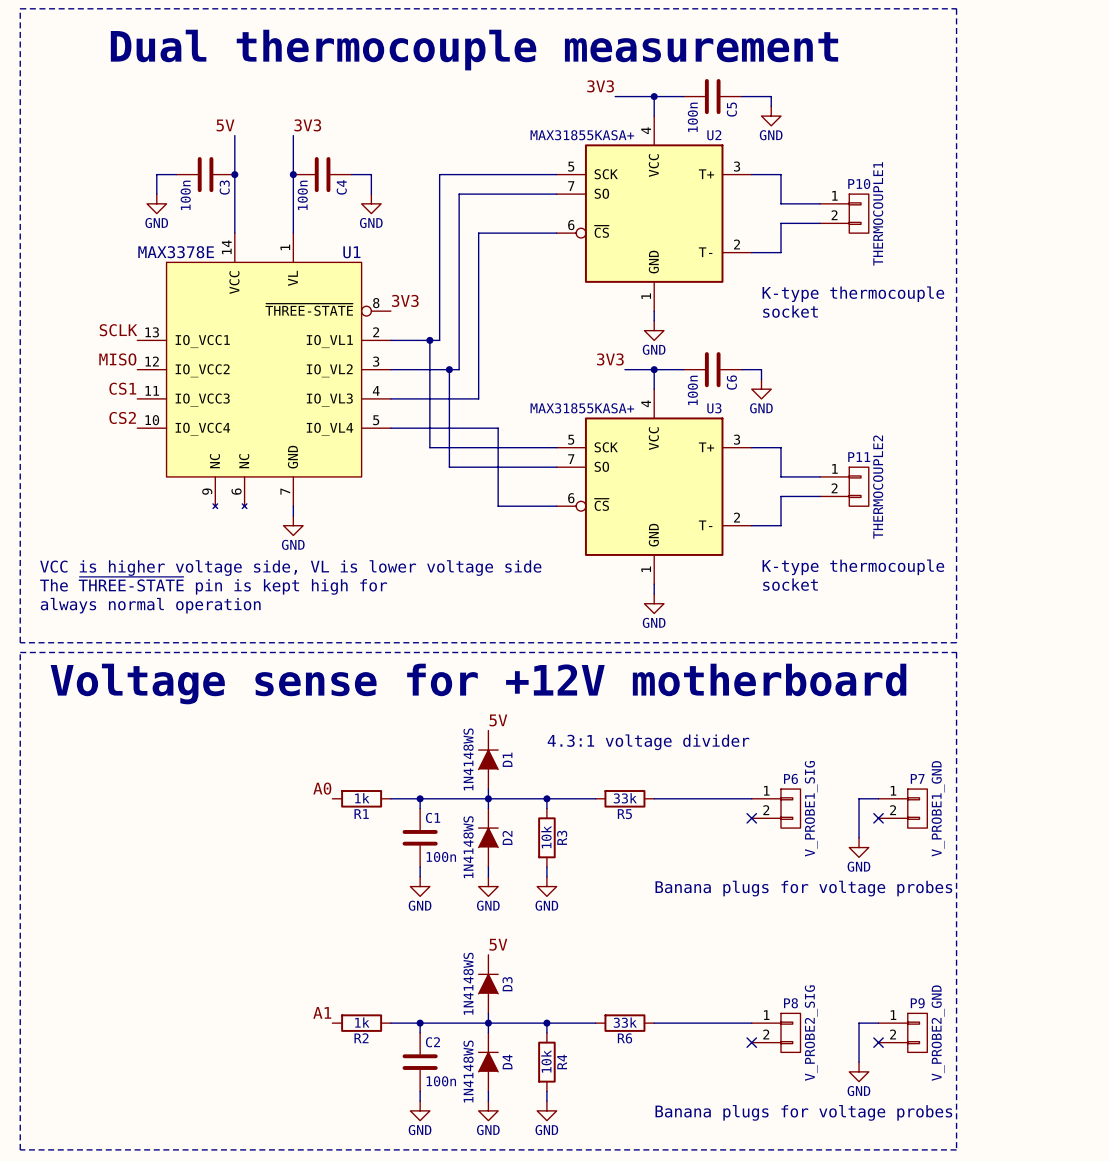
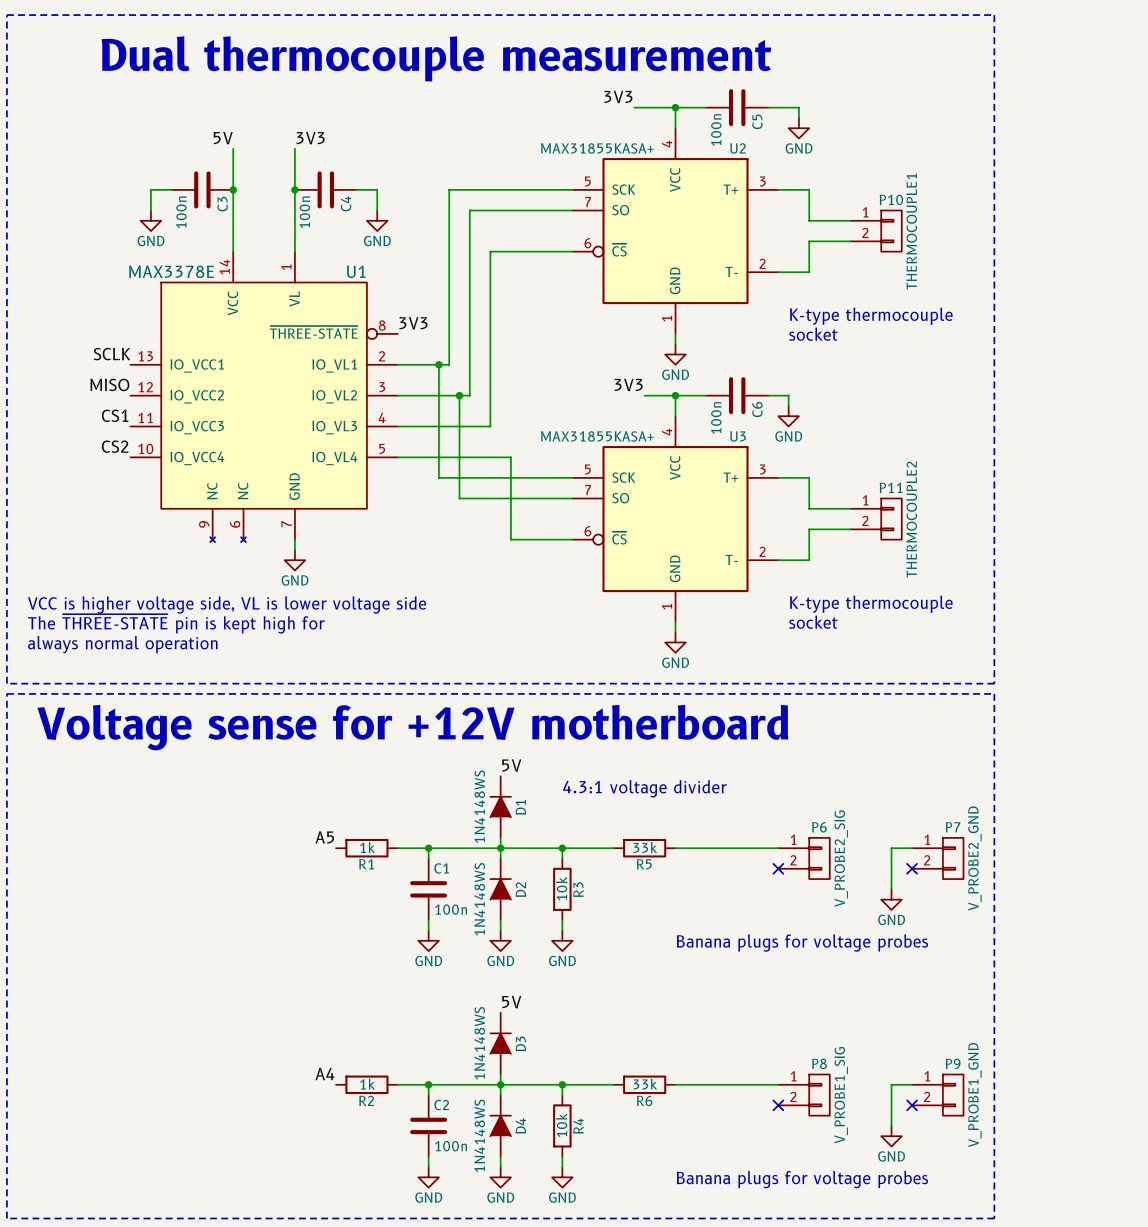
label: A0 (322, 788) -> A5 (324, 837)
P6 value: V_PROBE1_SIG (811, 808) -> V_PROBE2_SIG (841, 858)
P7 value: V_PROBE1_GND (938, 808) -> V_PROBE2_GND (974, 858)
label: A1 (322, 1012) -> A4 (324, 1074)
P8 value: V_PROBE2_SIG (811, 1033) -> V_PROBE1_SIG (841, 1095)
P9 value: V_PROBE2_GND (938, 1033) -> V_PROBE1_GND (974, 1095)

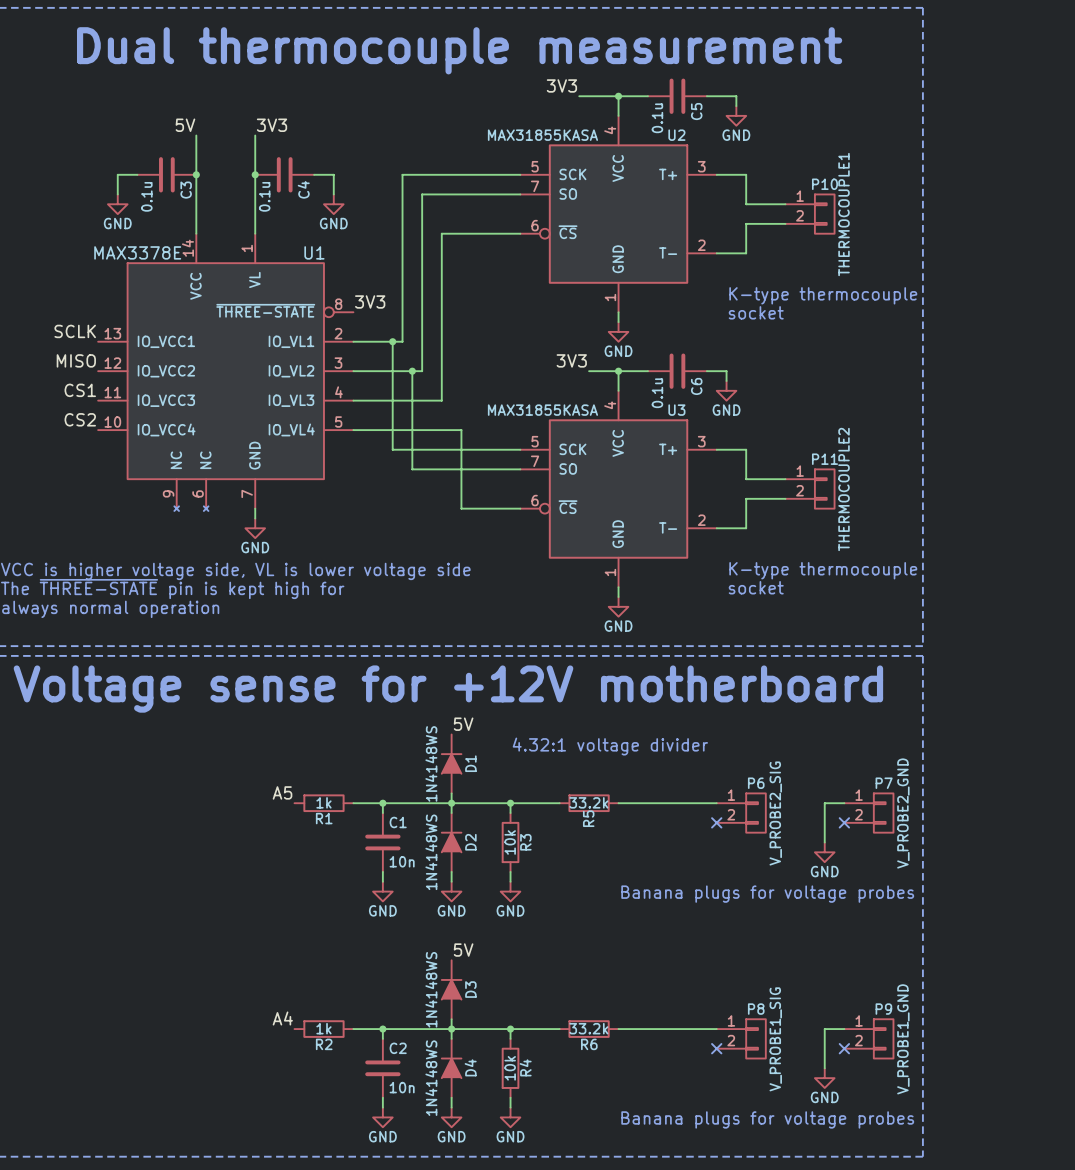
C5 value: 100n (716, 130) -> 0.1u (657, 118)
U2 value: MAX31855KASA+ (597, 148) -> MAX31855KASA (542, 135)
C3 value: 100n (181, 212) -> 0.1u (146, 196)
C4 value: 100n (304, 212) -> 0.1u (264, 196)
C6 value: 100n (716, 418) -> 0.1u (657, 393)
U3 value: MAX31855KASA+ (597, 436) -> MAX31855KASA (542, 410)
text: 4.3:1 voltage divider (644, 788) -> 4.32:1 voltage divider (610, 746)
R5 value: 33k (645, 847) -> 33.2k (588, 802)
R5 name rotation: 0° (644, 864) -> 90° counterclockwise (588, 818)
C1 value: 100n (451, 909) -> 10n (402, 861)
R6 value: 33k (645, 1084) -> 33.2k (588, 1028)
C2 value: 100n (451, 1146) -> 10n (402, 1087)

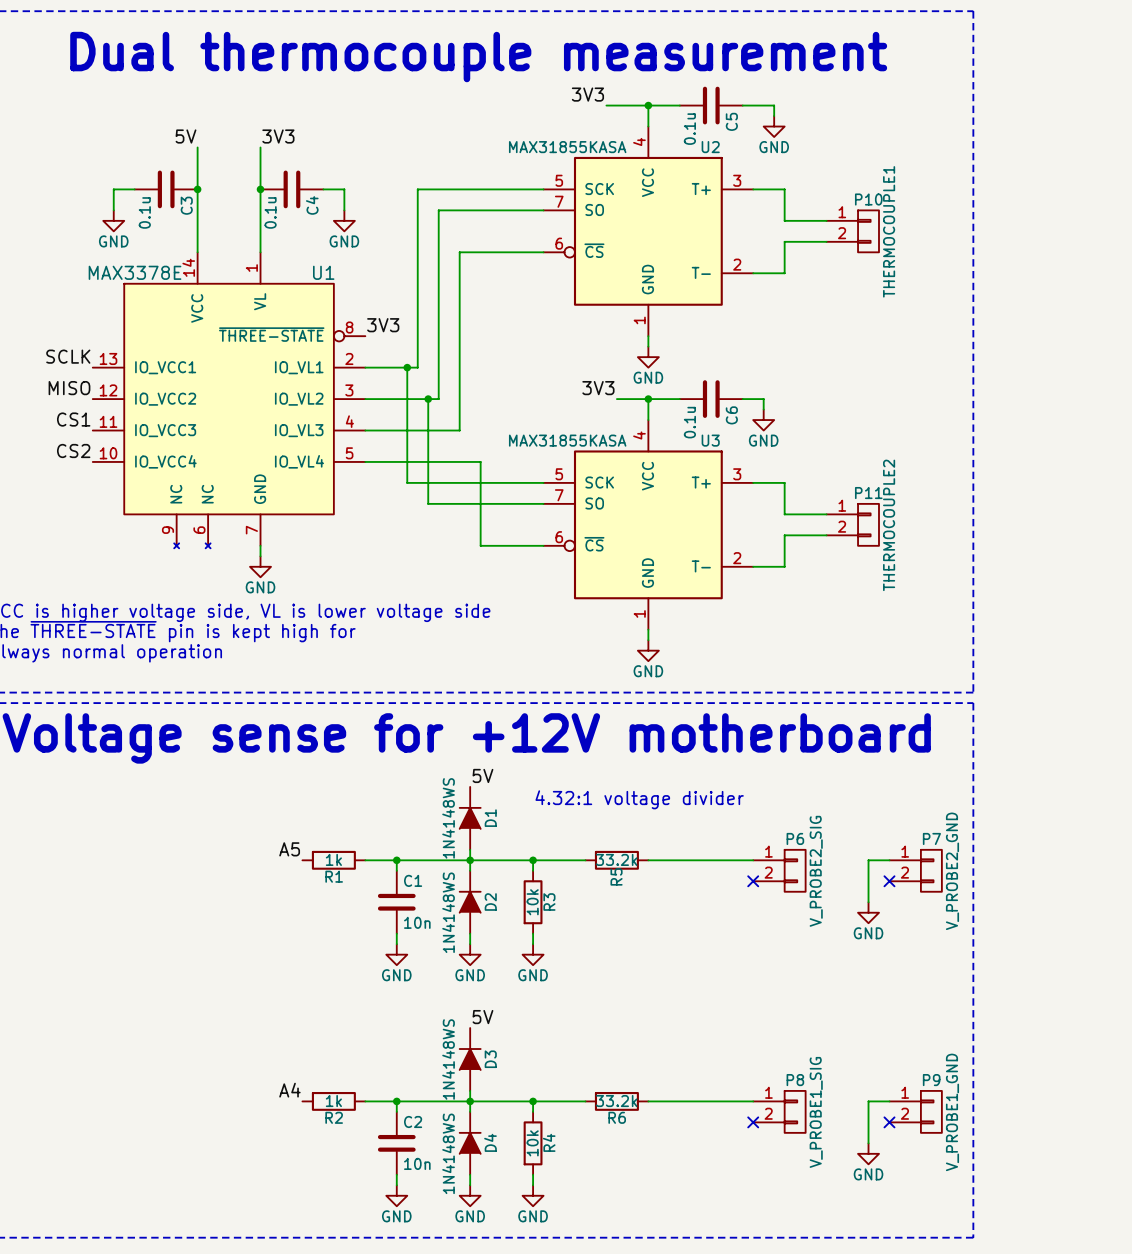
text: K-type thermocouple (823, 295) -> none
text: socket (756, 312) -> none
text: K-type thermocouple (823, 570) -> none
text: socket (756, 587) -> none
text: Banana plugs for voltage probes (767, 894) -> none
text: Banana plugs for voltage probes (767, 1119) -> none

